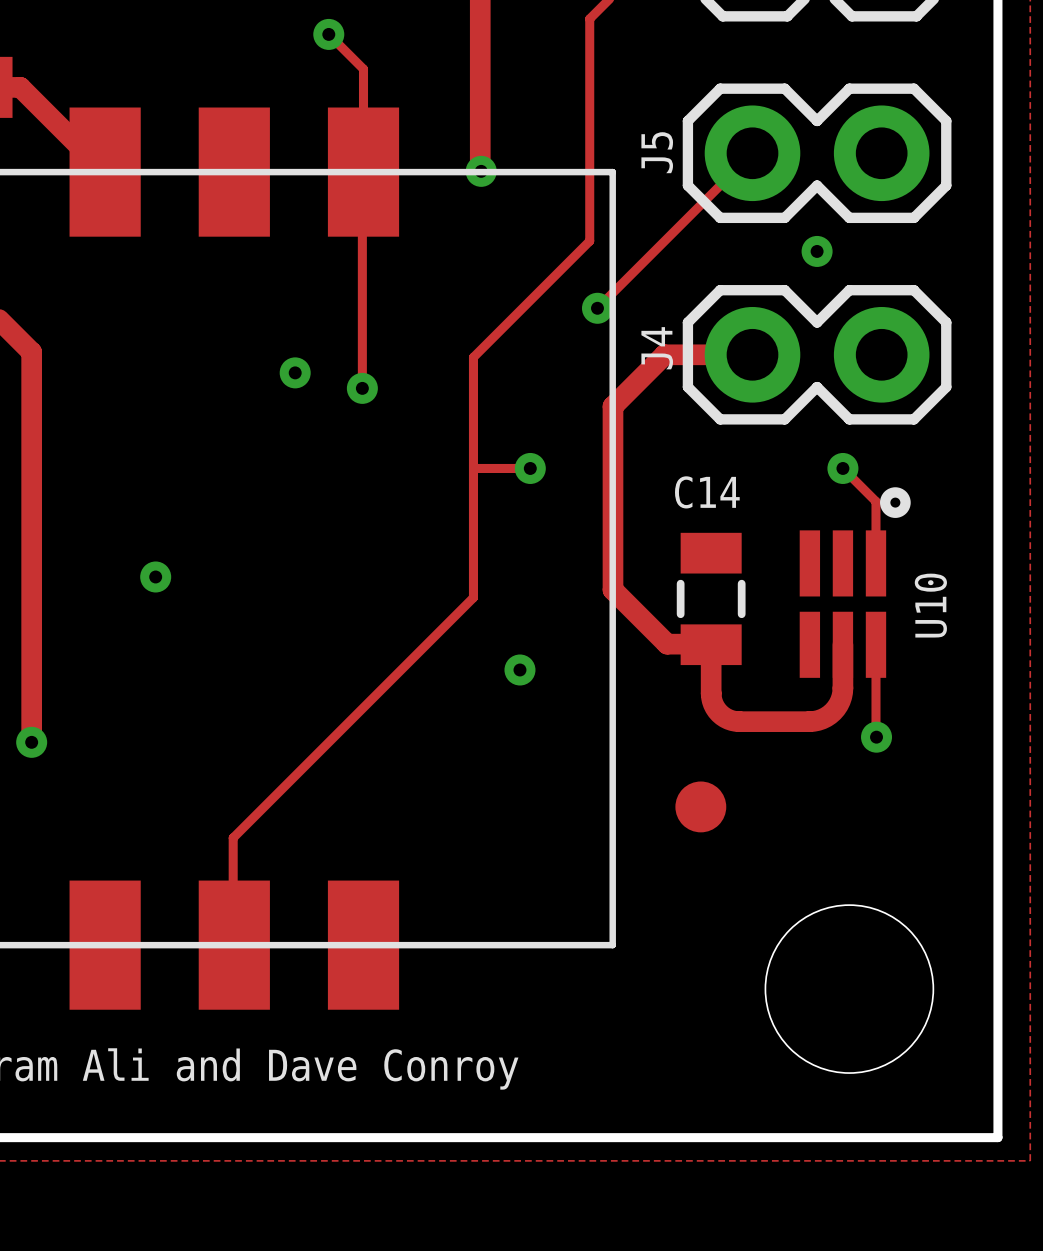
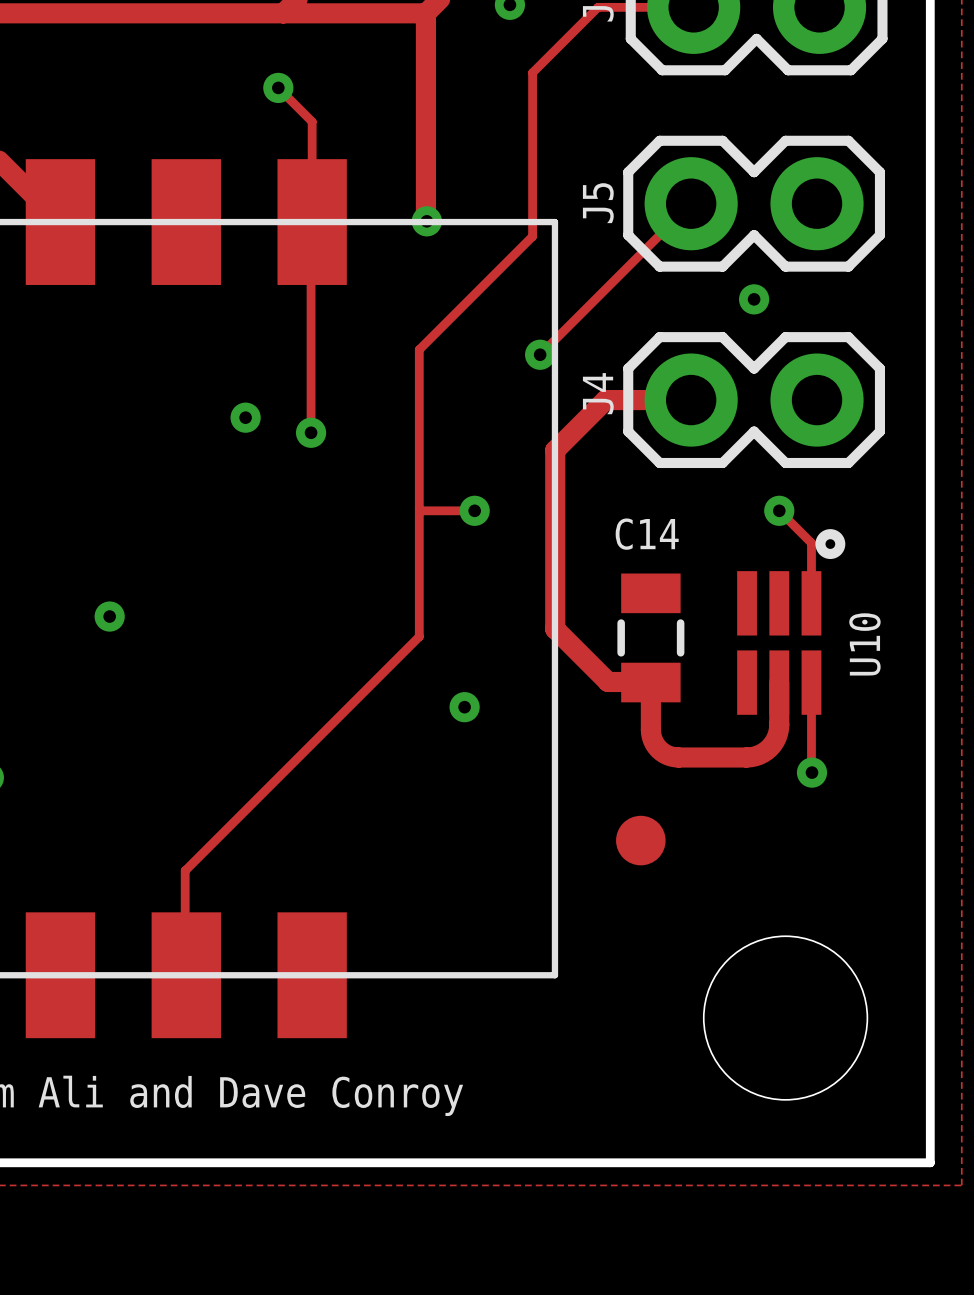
track: (589, 186) (589, 241) (473, 357) -> (532, 236) (419, 349) (419, 402)

